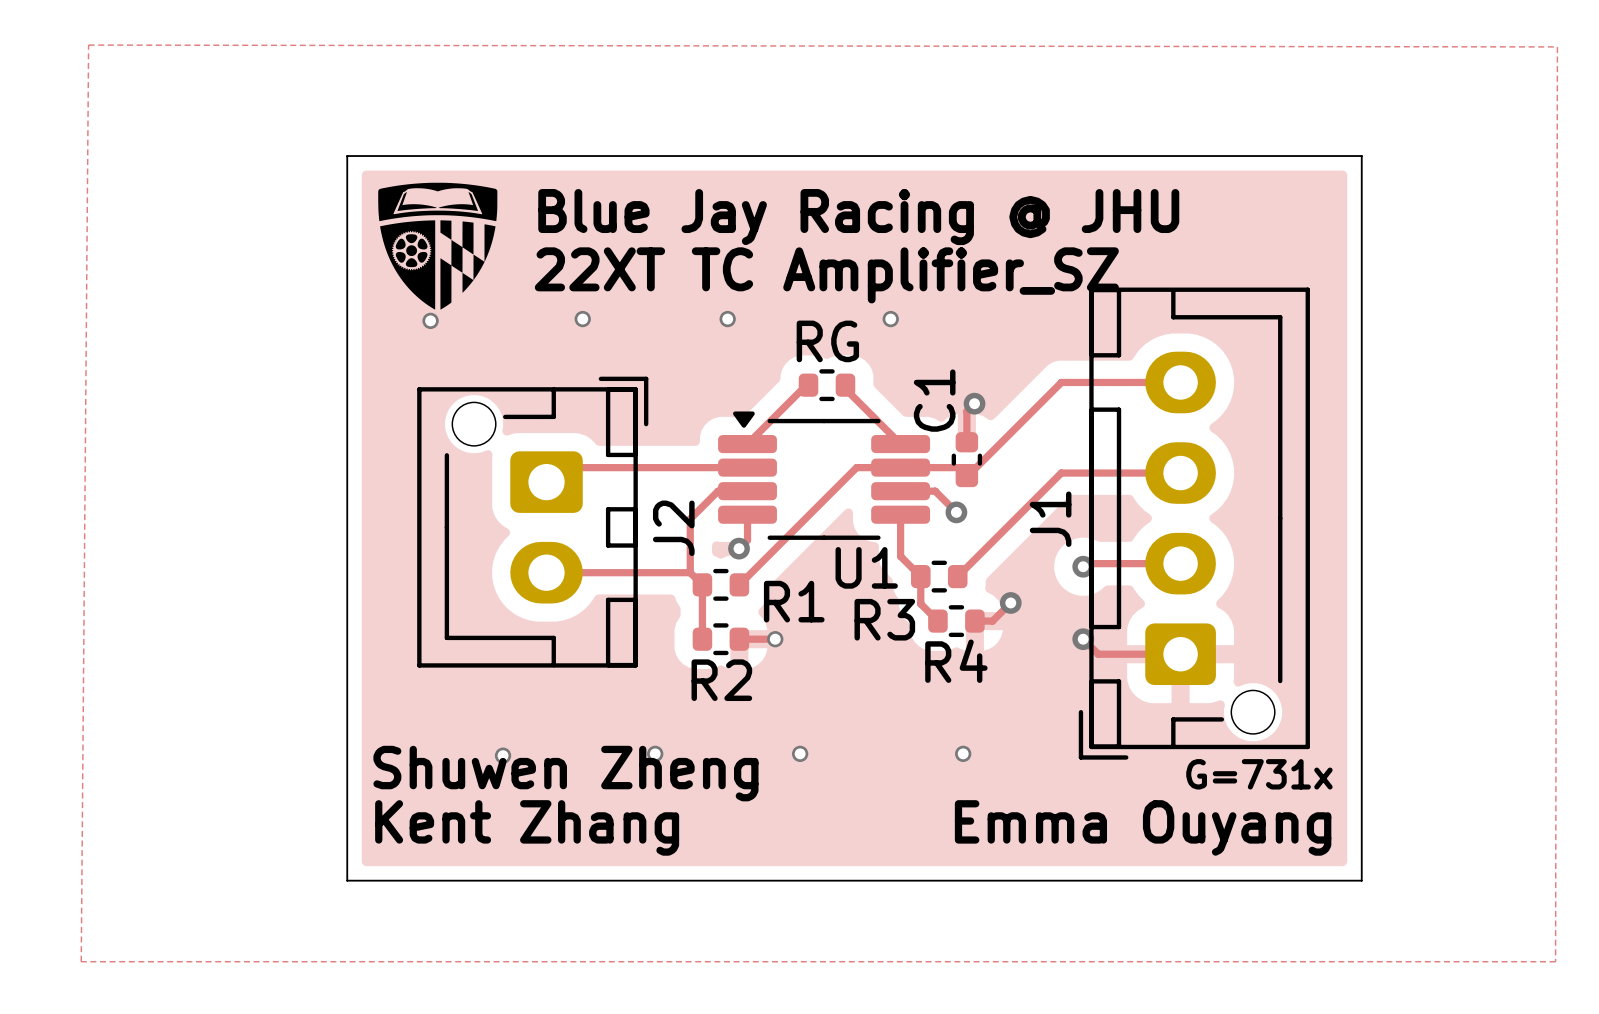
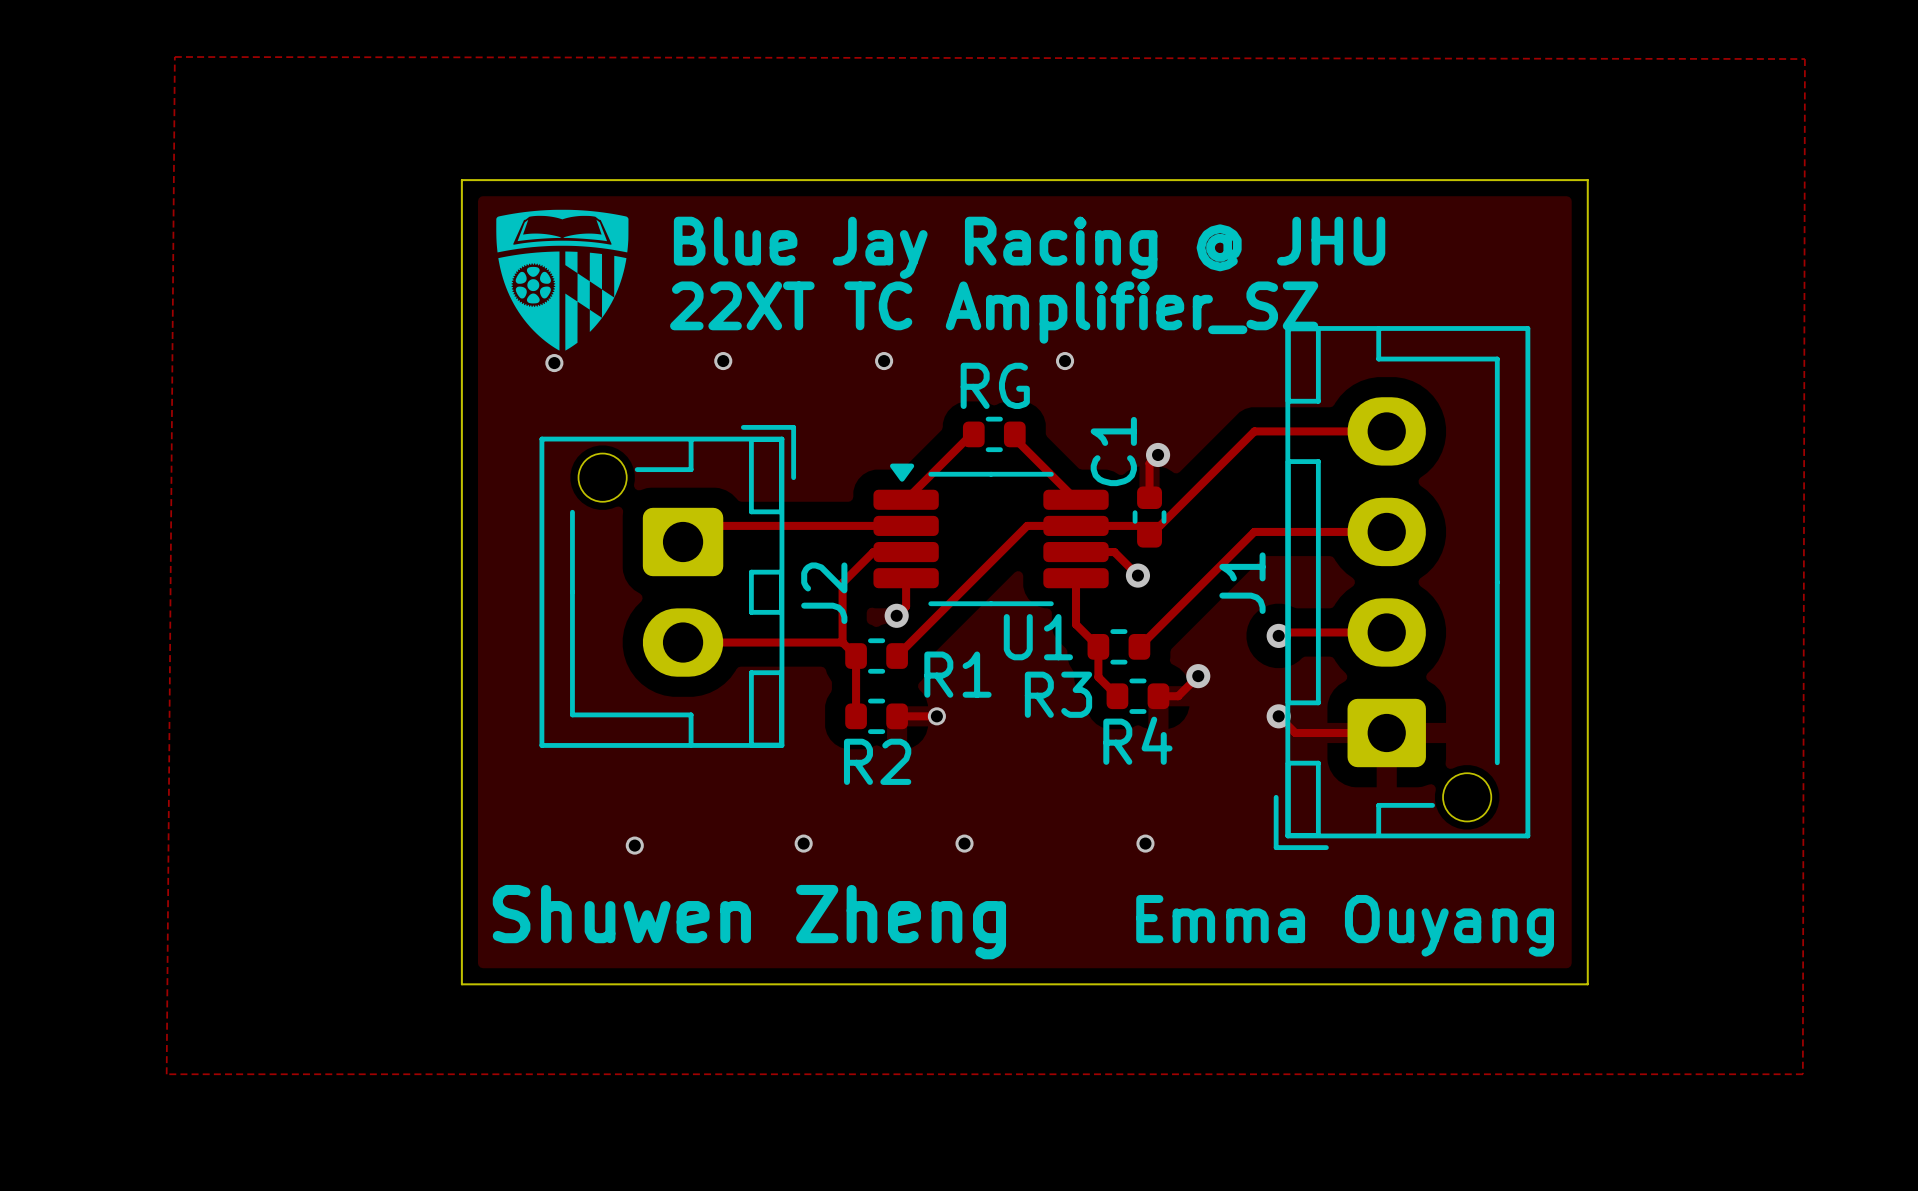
text: Shuwen Zheng (565, 773) -> none
text: G=731x (1259, 774) -> none
text: Kent Zhang (527, 827) -> Shuwen Zheng (749, 922)

